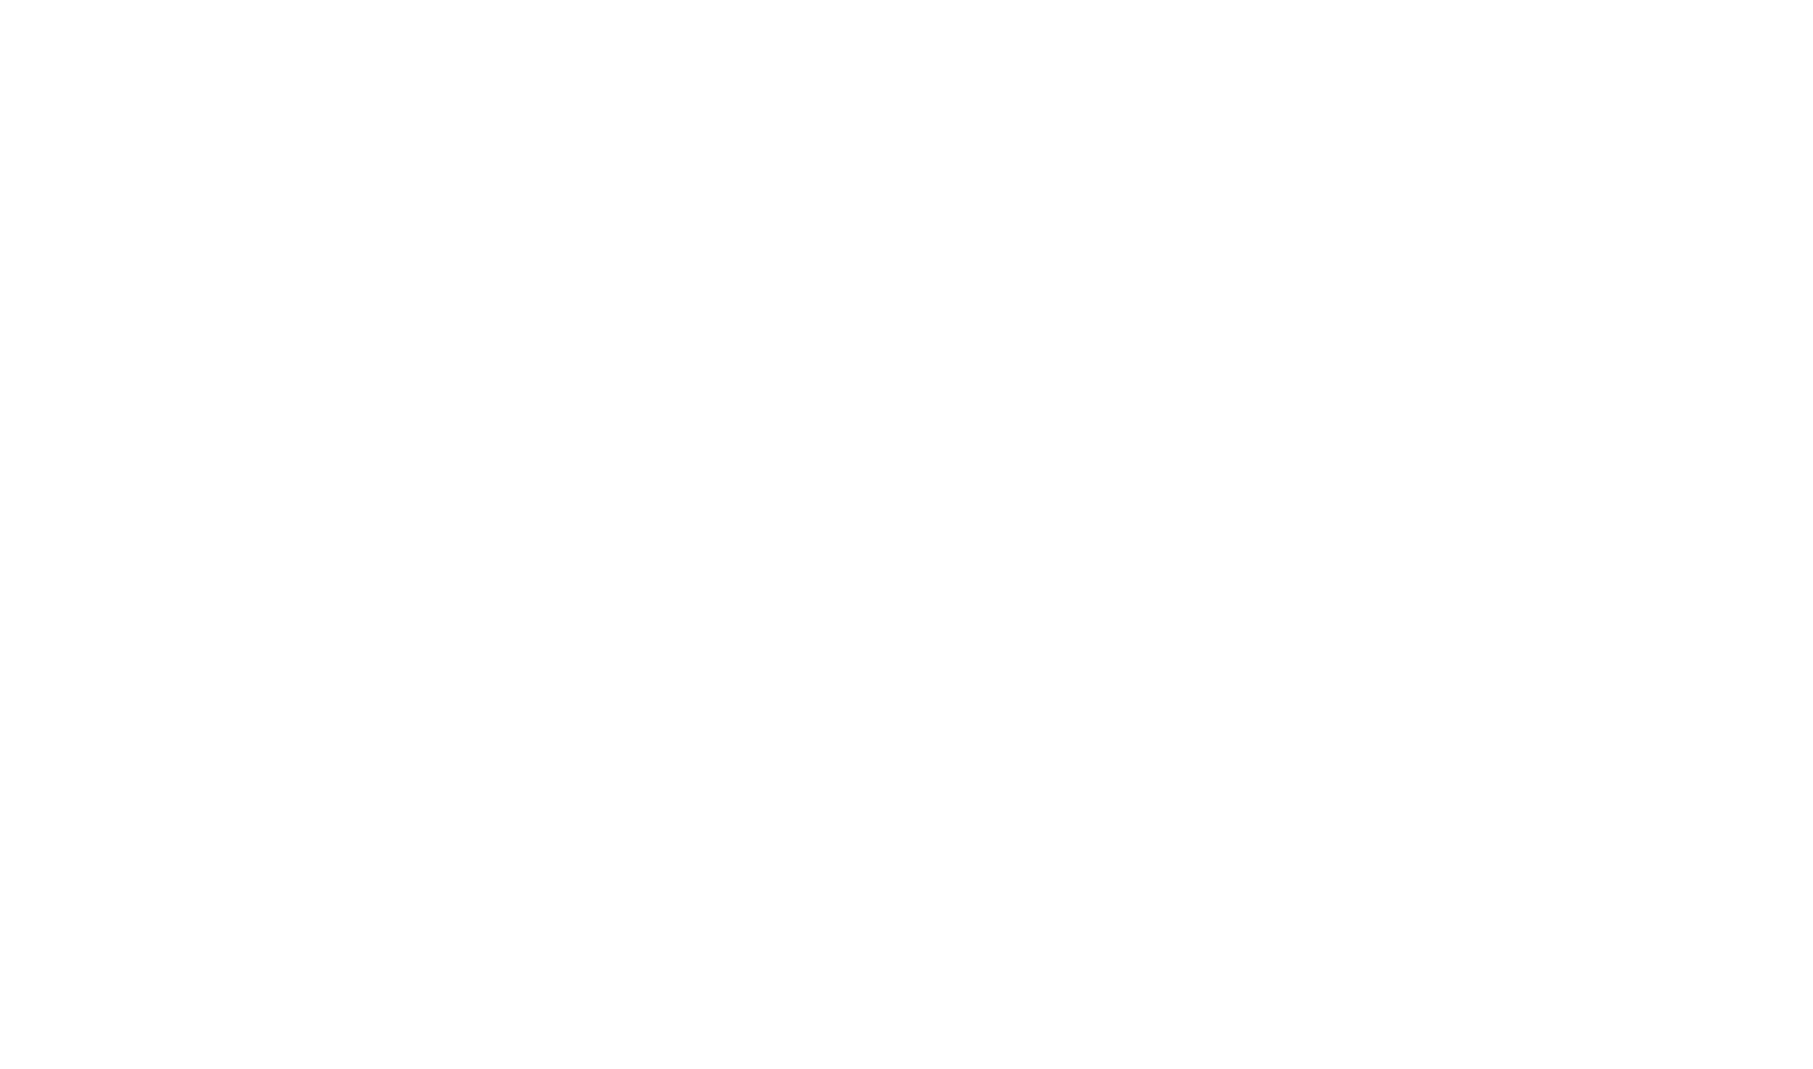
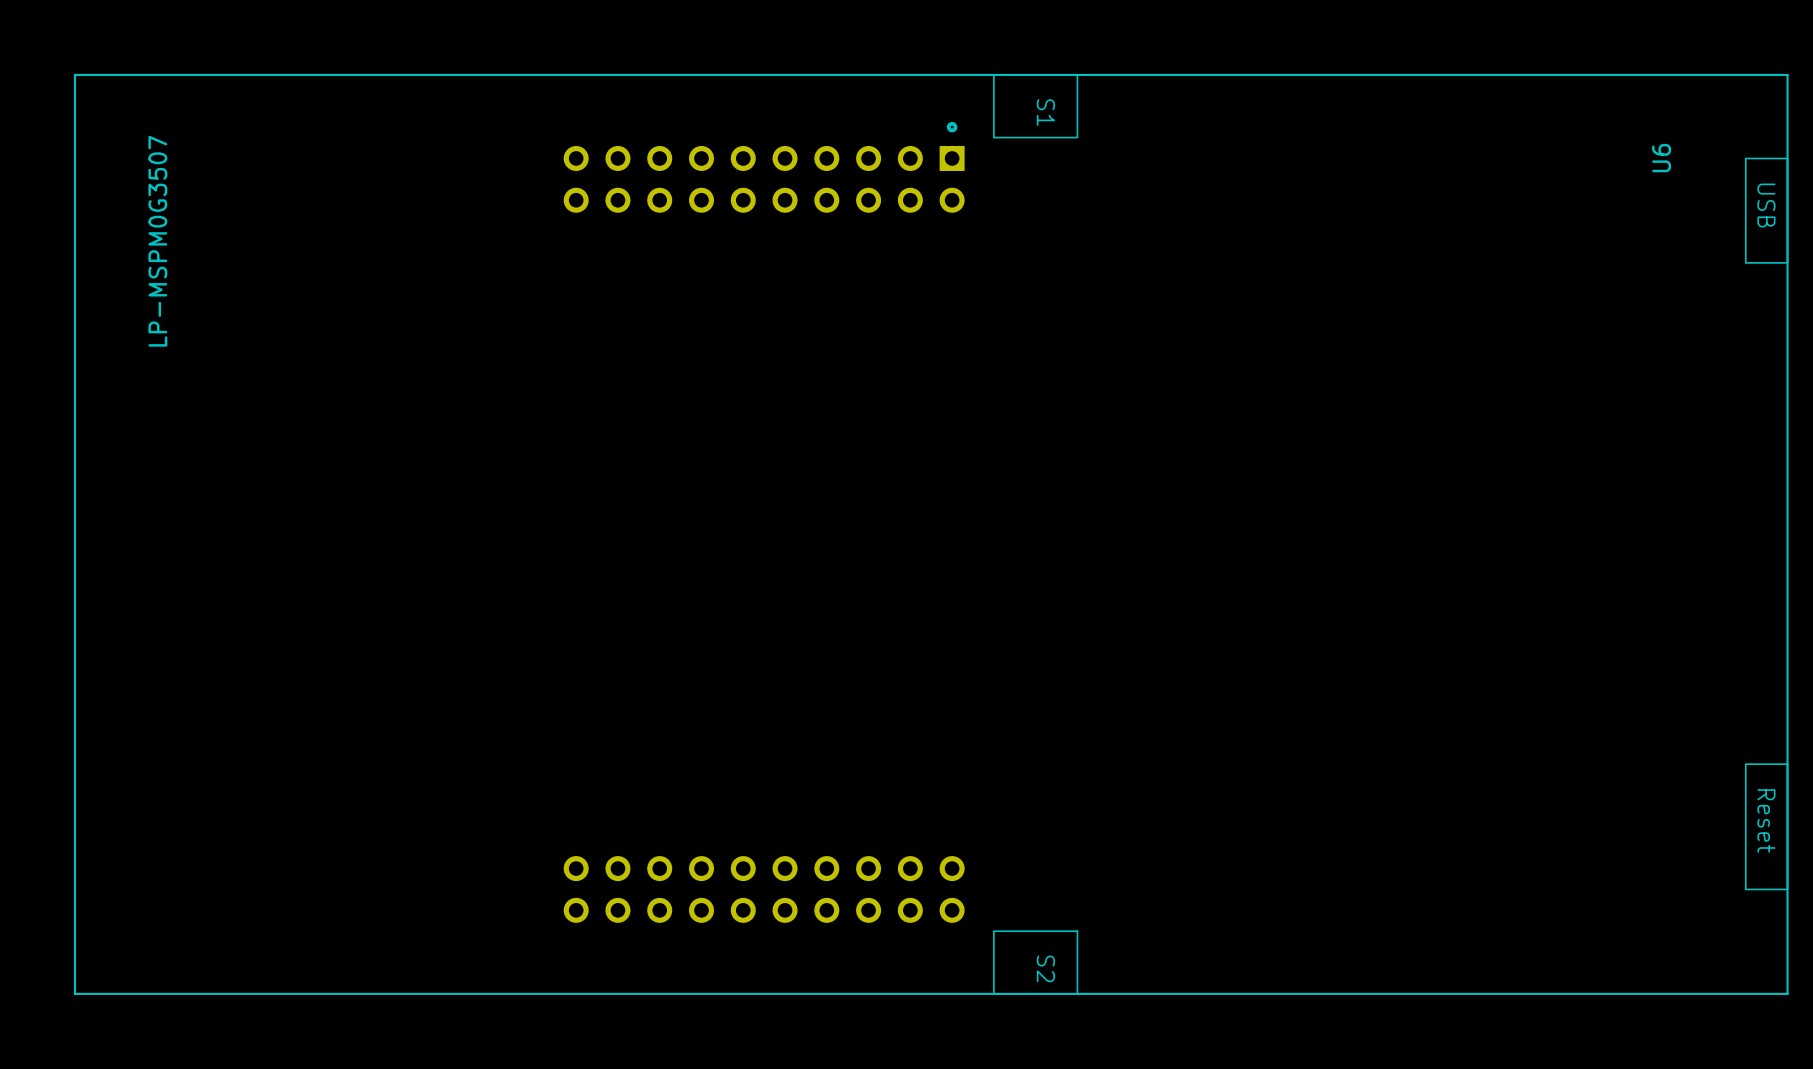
U6: none -> LP-MSPM0G3507 (931, 534)

